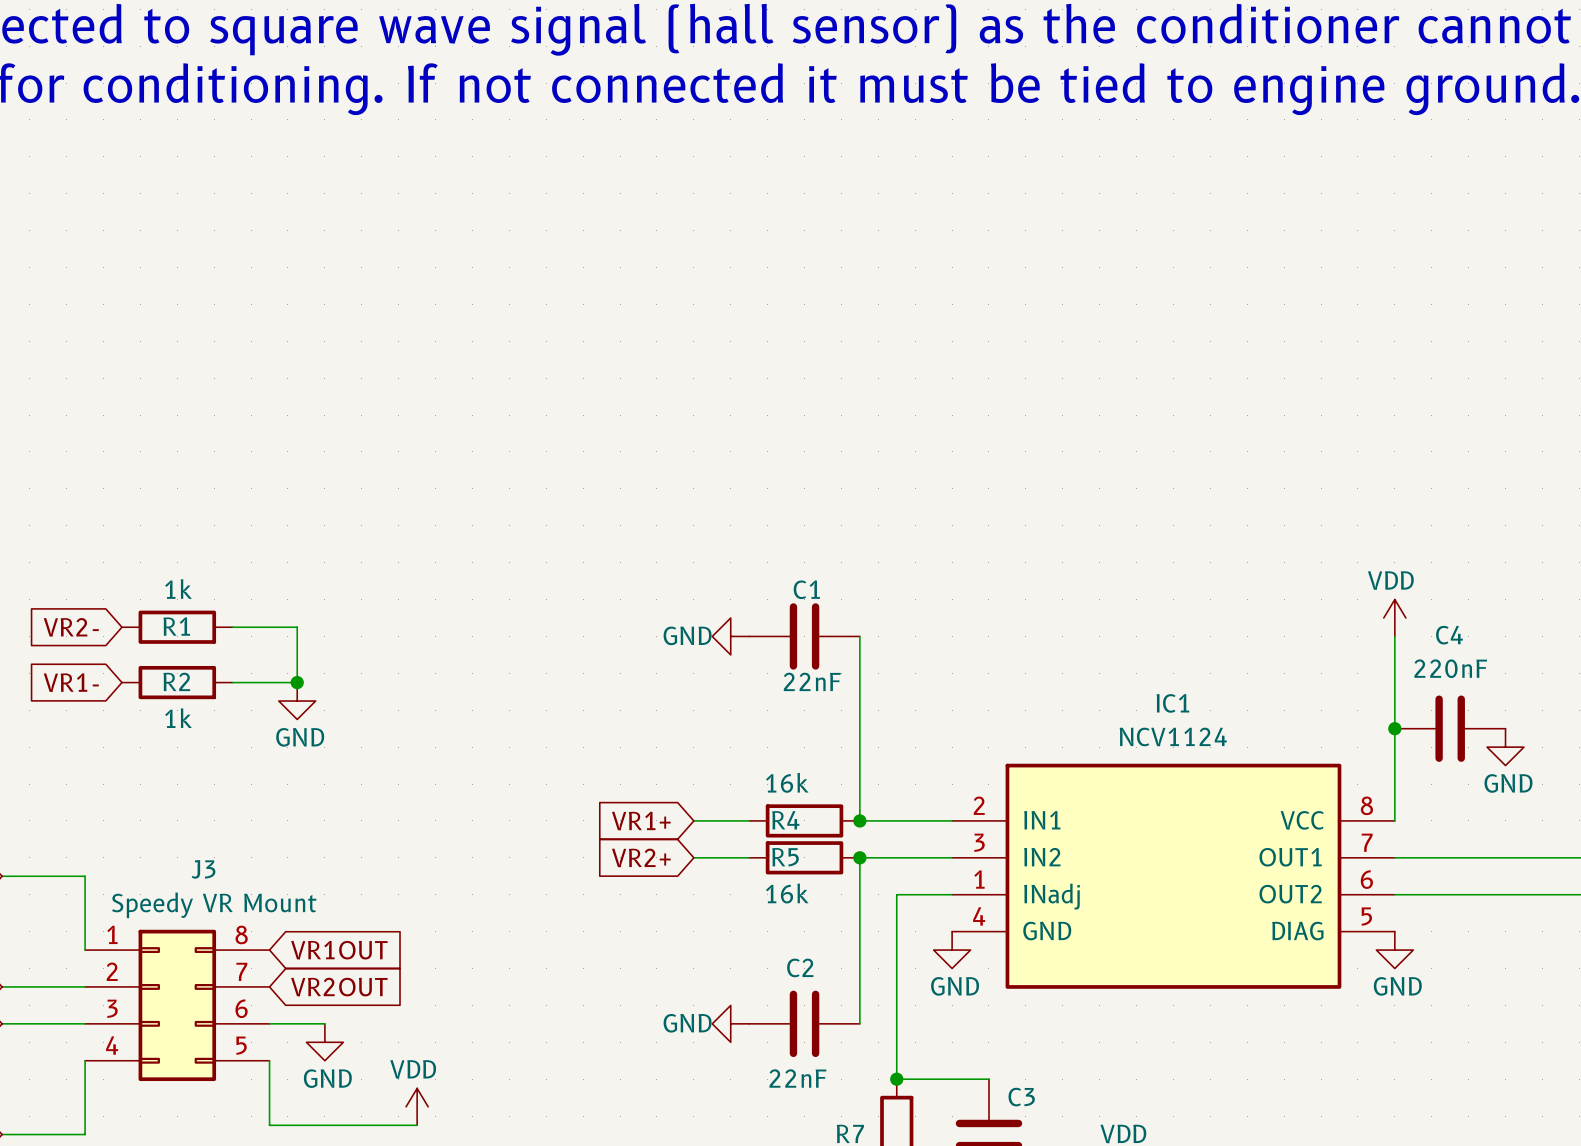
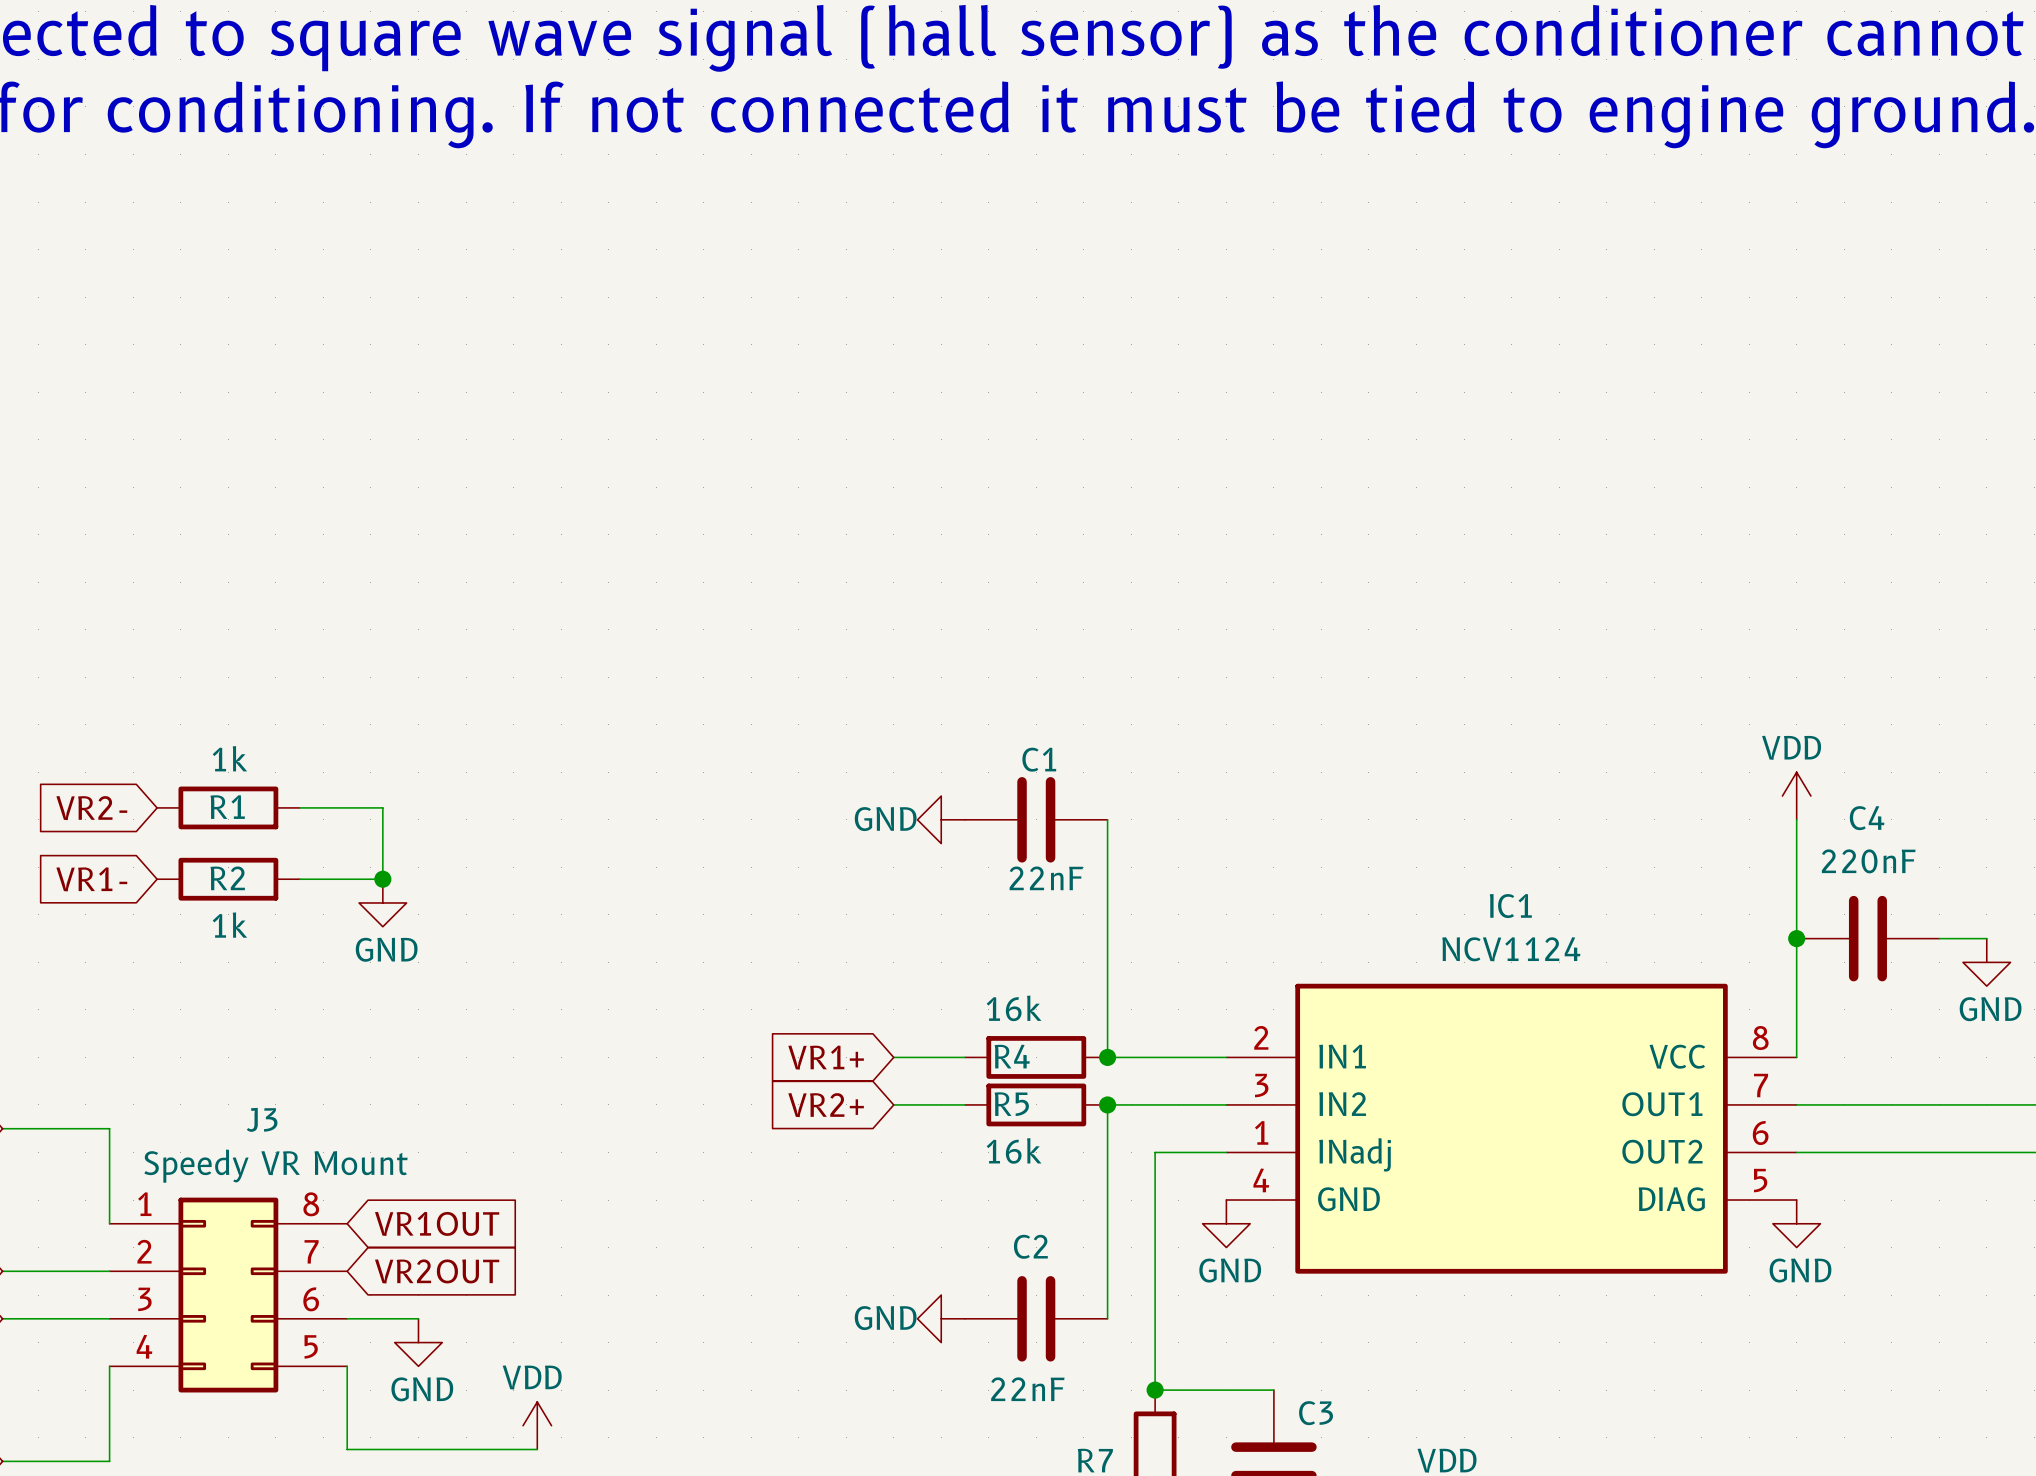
wire: none -> (1939, 938) (1986, 938)
power symbol position: GND (1505, 747) -> GND (1986, 962)

